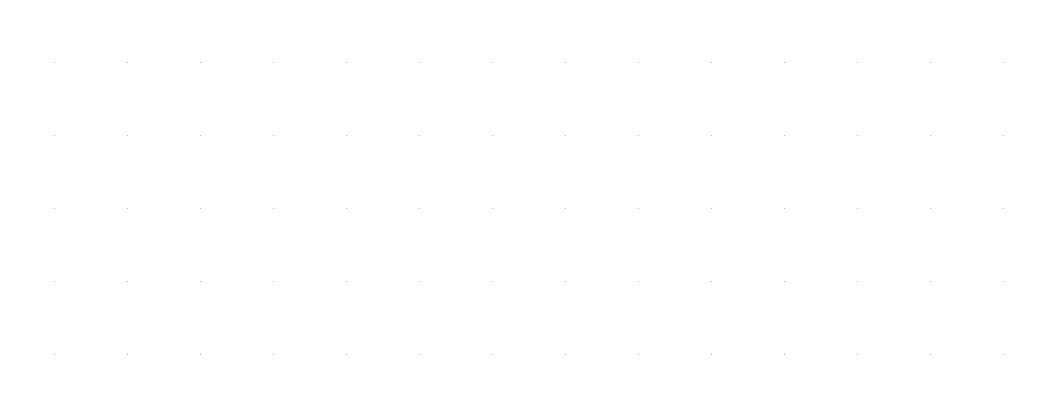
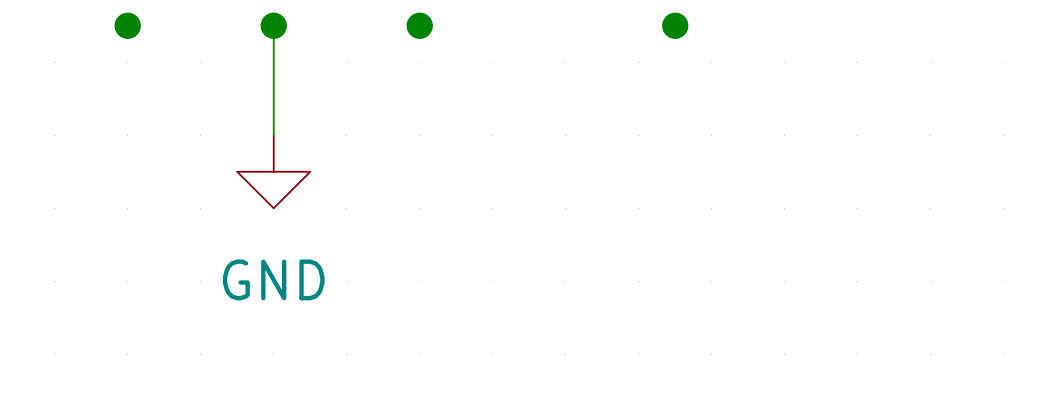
junction: none -> (127, 25)
wire: none -> (273, 25) (273, 135)
junction: none -> (273, 25)
junction: none -> (419, 25)
junction: none -> (675, 25)
power symbol: none -> GND (273, 171)

